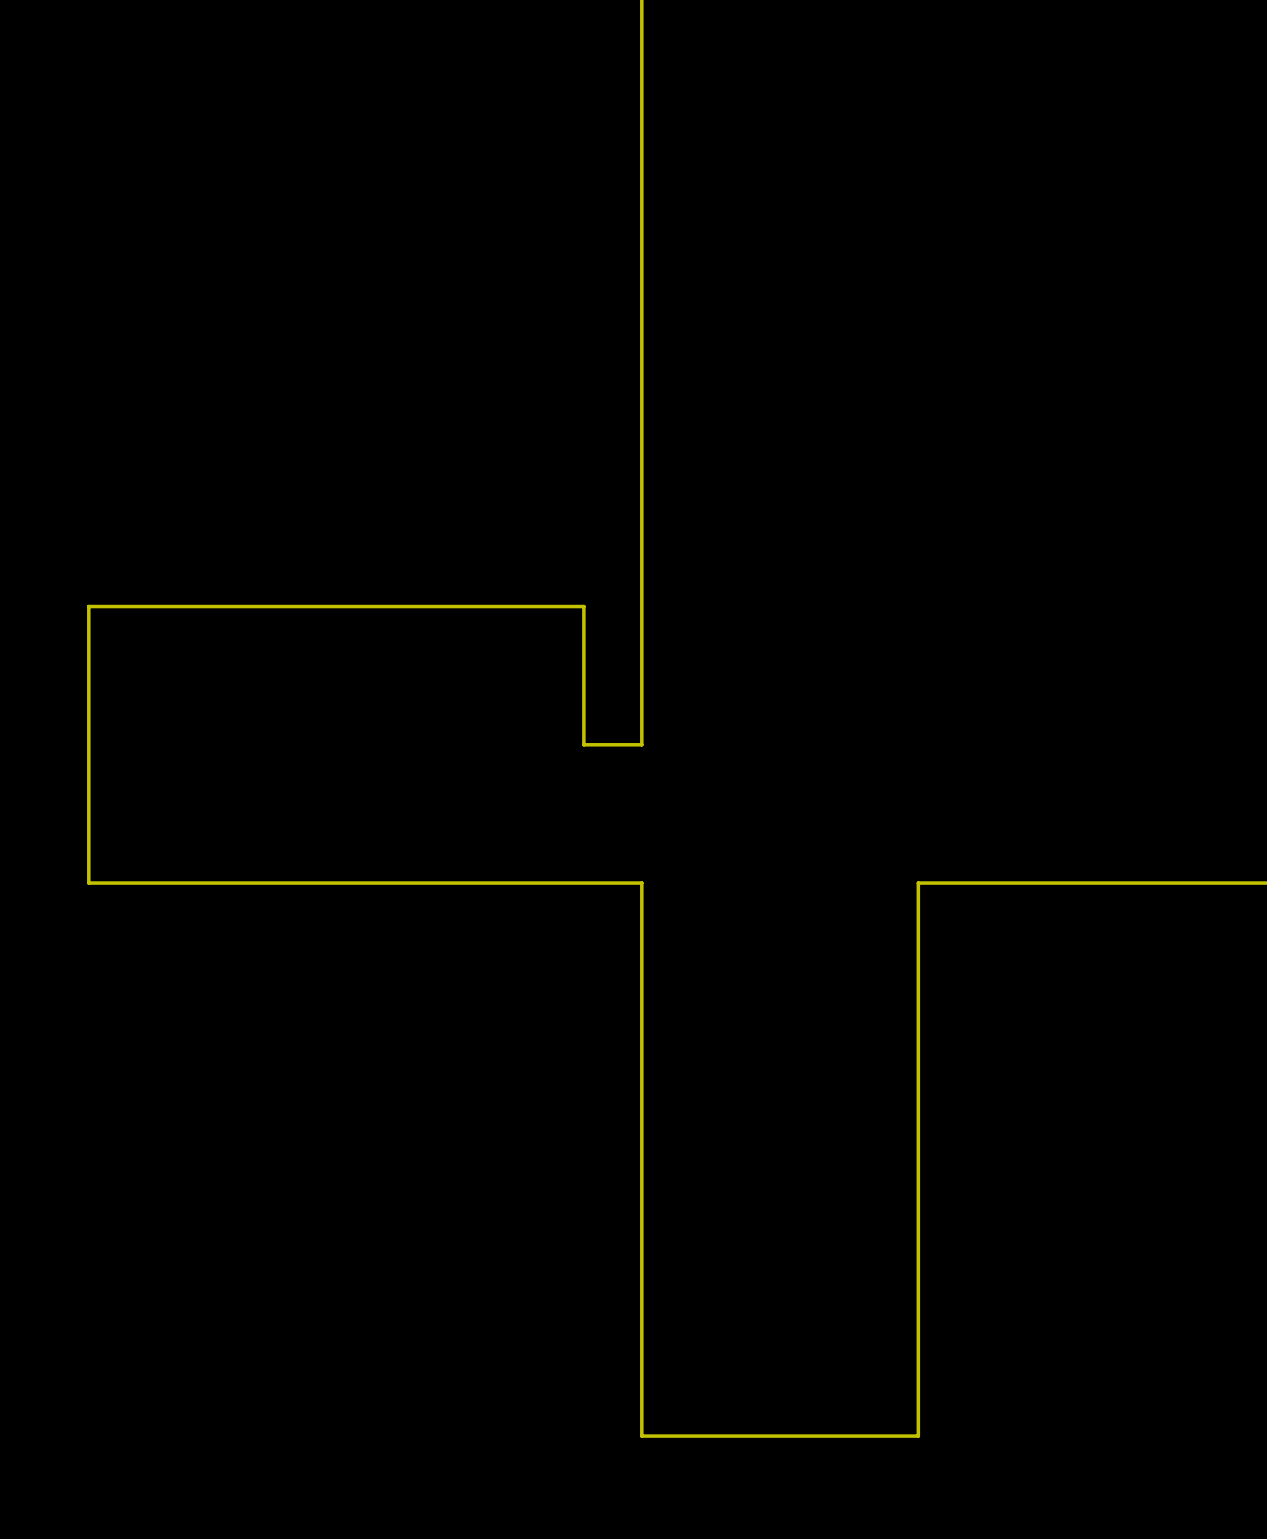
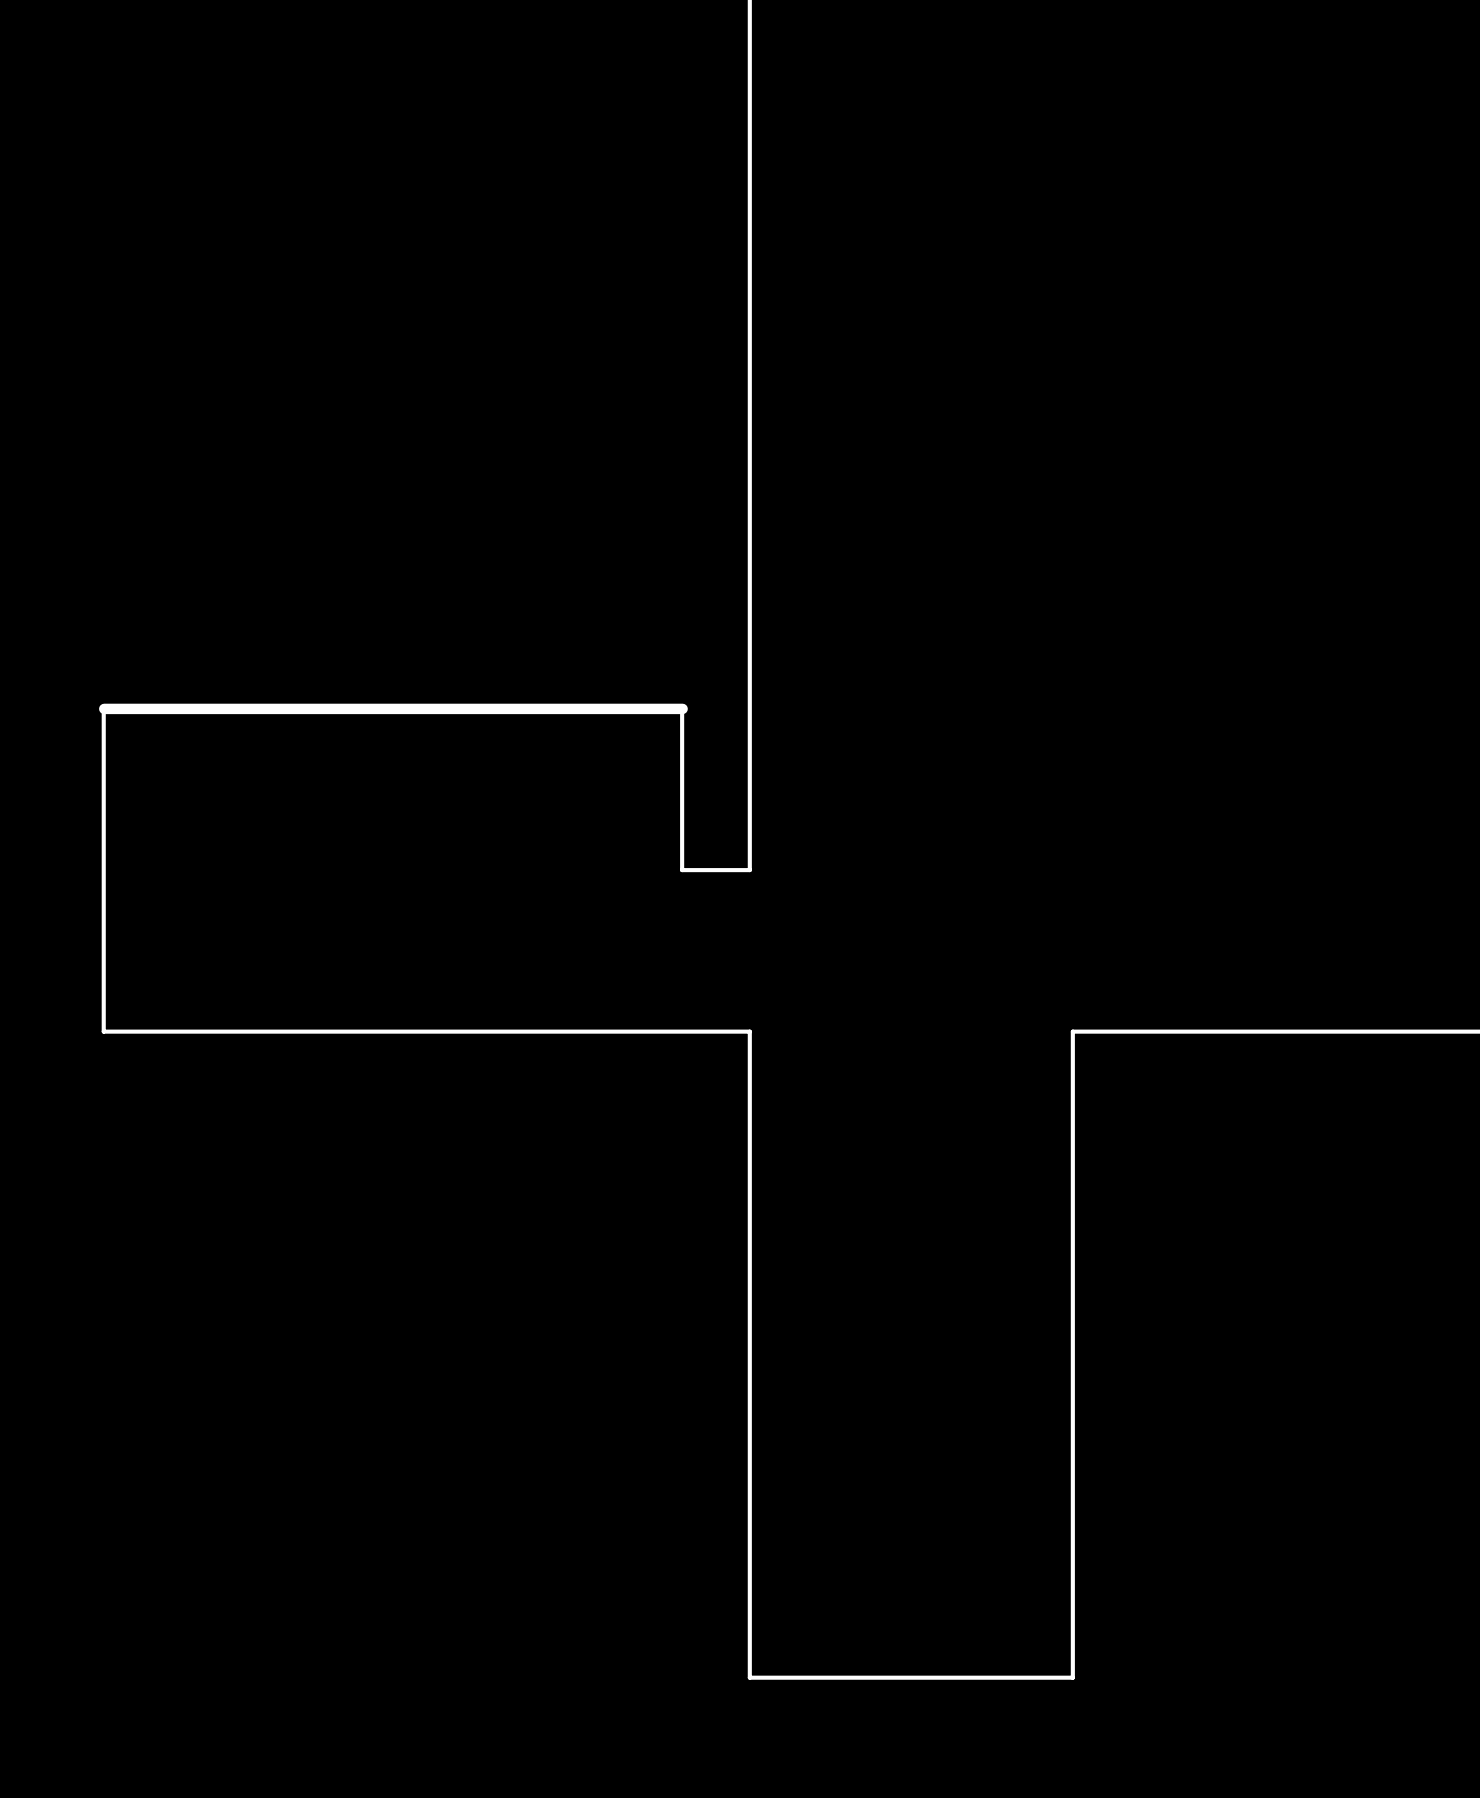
board edge width: thin (88, 606) (583, 606) -> thick (103, 708) (682, 708)

